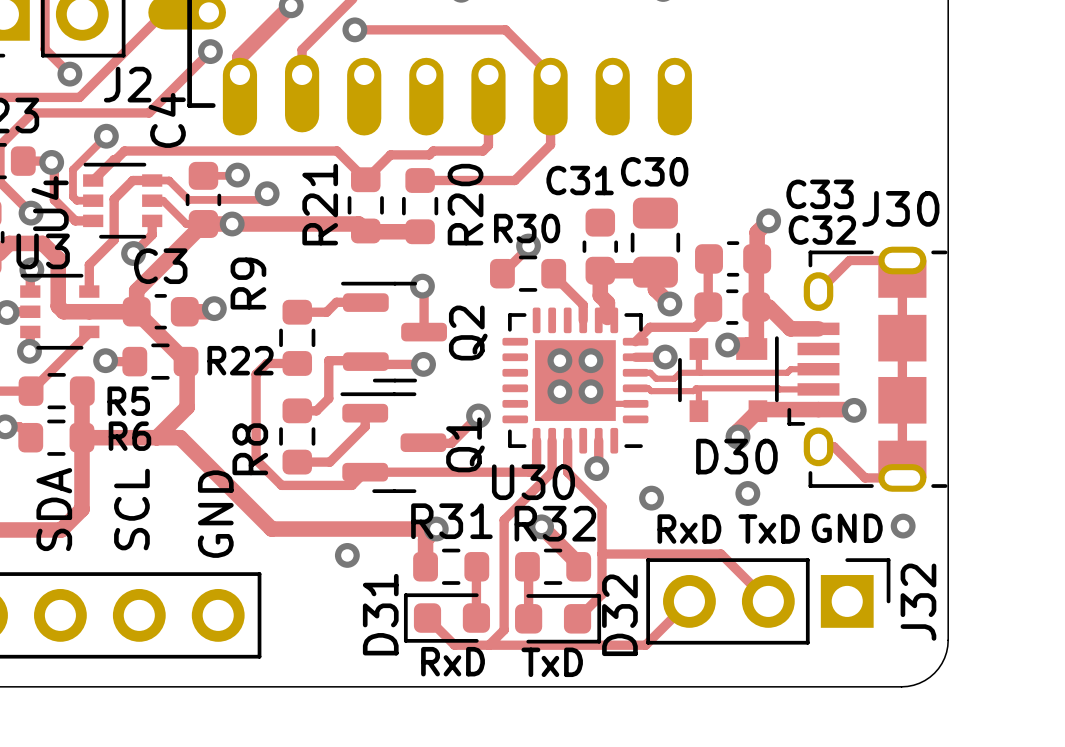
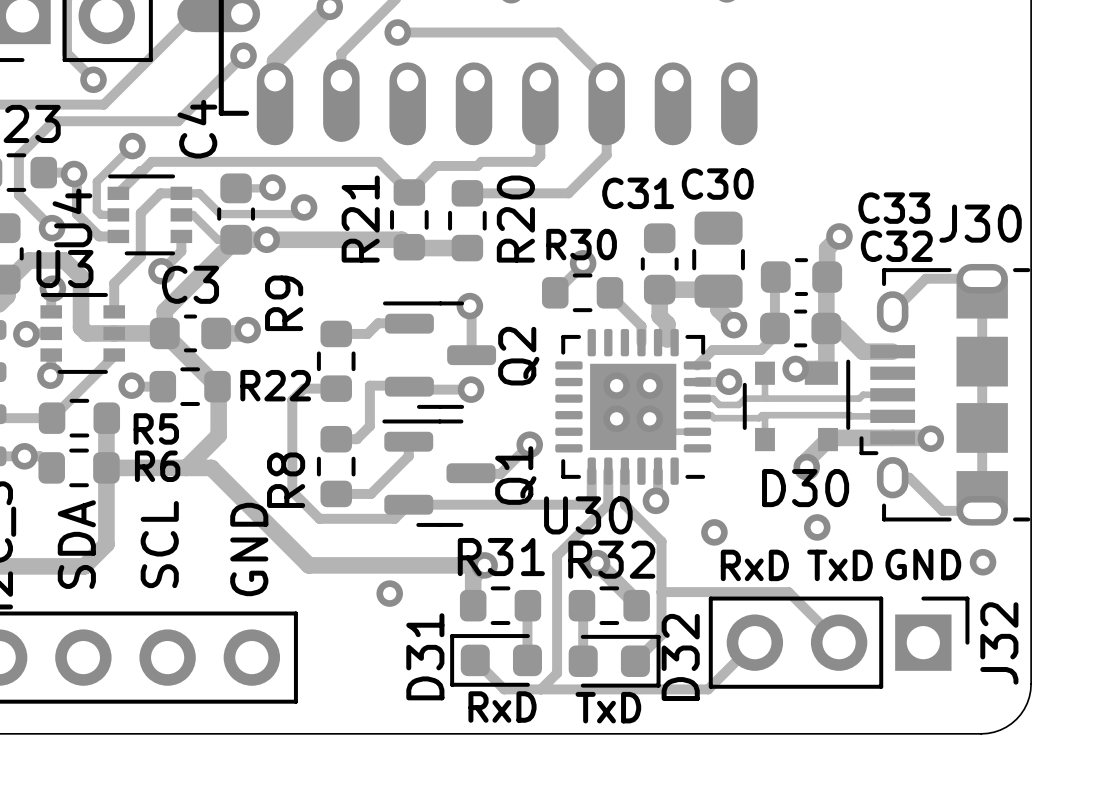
J2 name: J2 (127, 84) -> none

